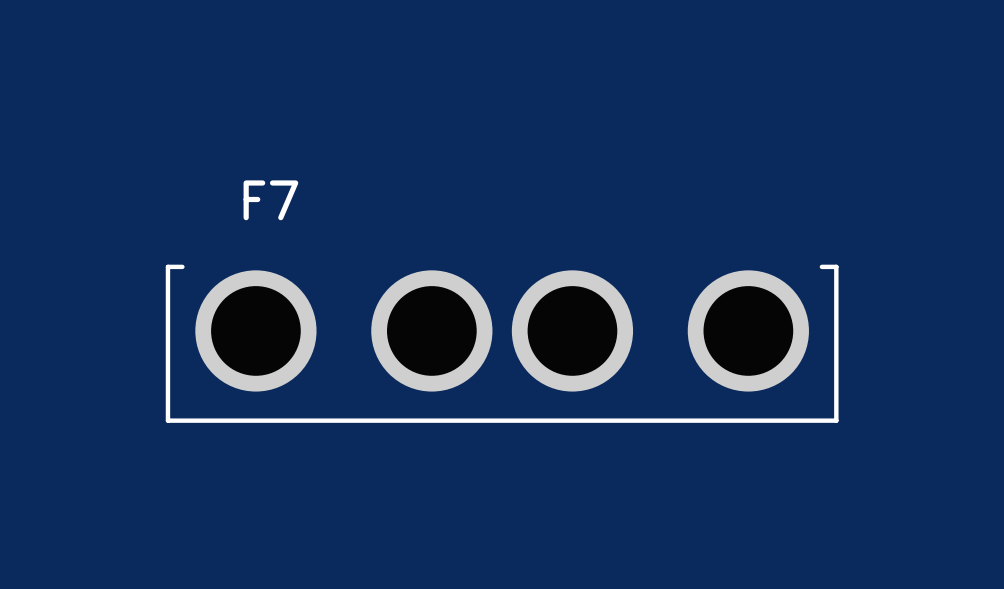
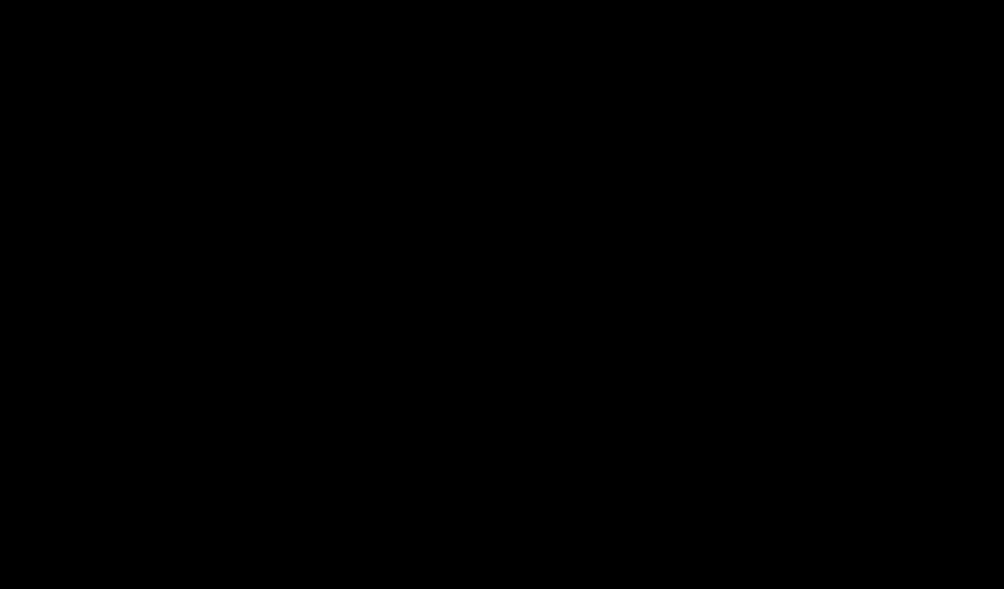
F7: (502, 343) -> none

